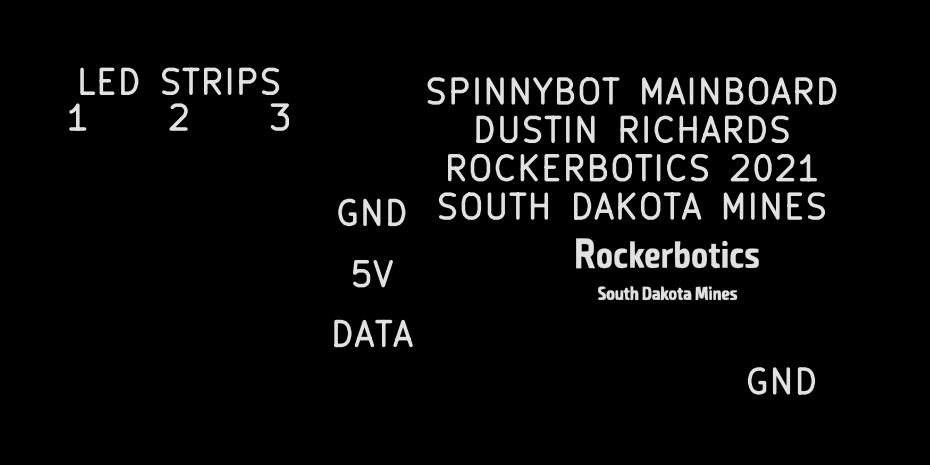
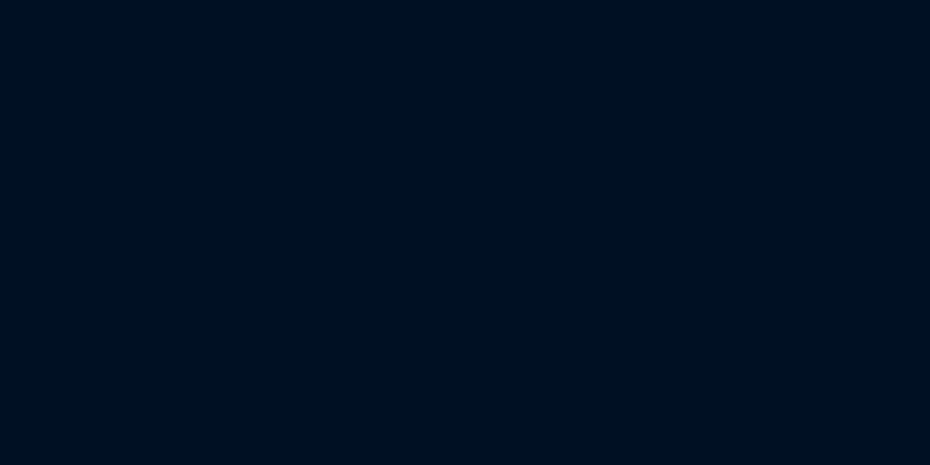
text: LED STRIPS (179, 81) -> none
text: SPINNYBOT MAINBOARD (631, 90) -> none
text: 1 (77, 117) -> none
text: 2 (178, 117) -> none
text: 3 (279, 117) -> none
text: DUSTIN RICHARDS (632, 129) -> none
text: ROCKERBOTICS 2021 (632, 167) -> none
text: SOUTH DAKOTA MINES (631, 206) -> none
text: GND (371, 212) -> none
drawing: [576, 238, 759, 301] -> none
text: 5V (372, 273) -> none
text: DATA (373, 333) -> none
text: GND (781, 380) -> none

